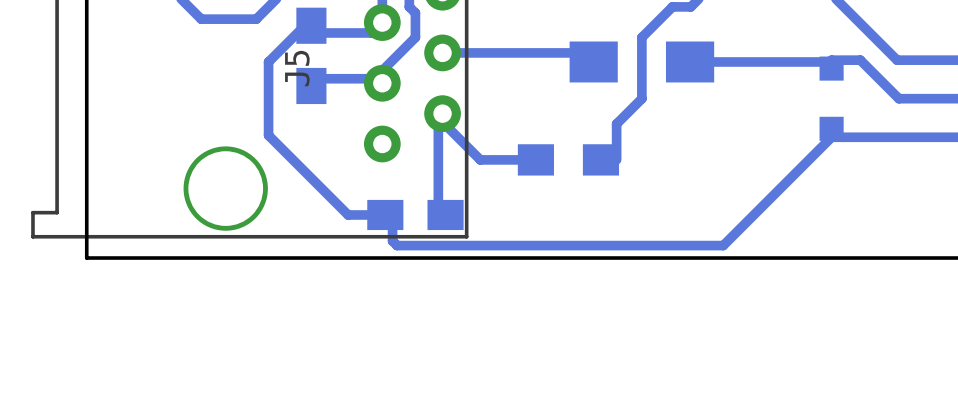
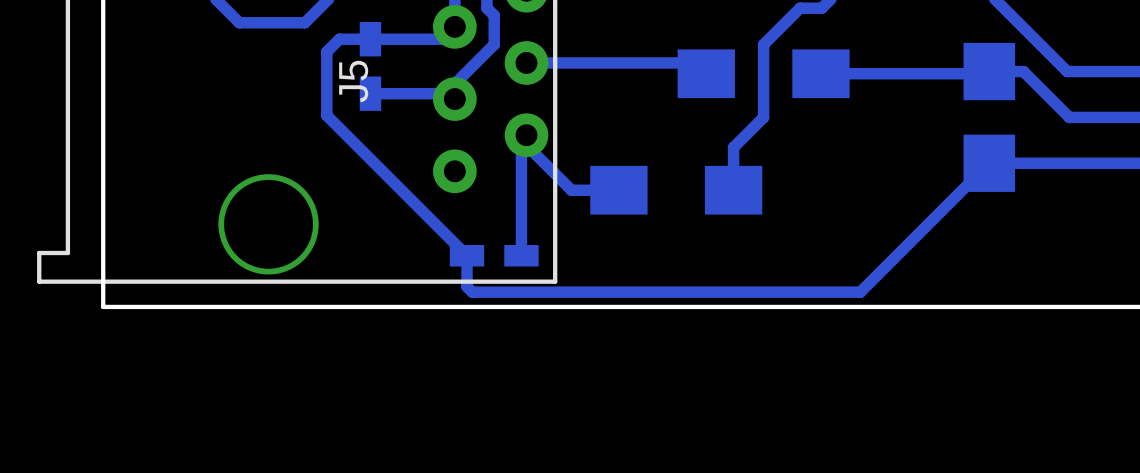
part footprint: [296, 7, 327, 105] -> [359, 22, 382, 111]
bottom track: (311, 25) (304, 25) (268, 61) (268, 135) (348, 214) (385, 214) -> none
bottom track: none -> (370, 39) (339, 39) (326, 51) (326, 115) (467, 255)
part footprint: [819, 56, 844, 141] -> [963, 42, 1016, 192]
part footprint: [517, 144, 620, 176] -> [590, 165, 763, 215]
part footprint: [367, 199, 464, 231] -> [449, 245, 539, 267]

